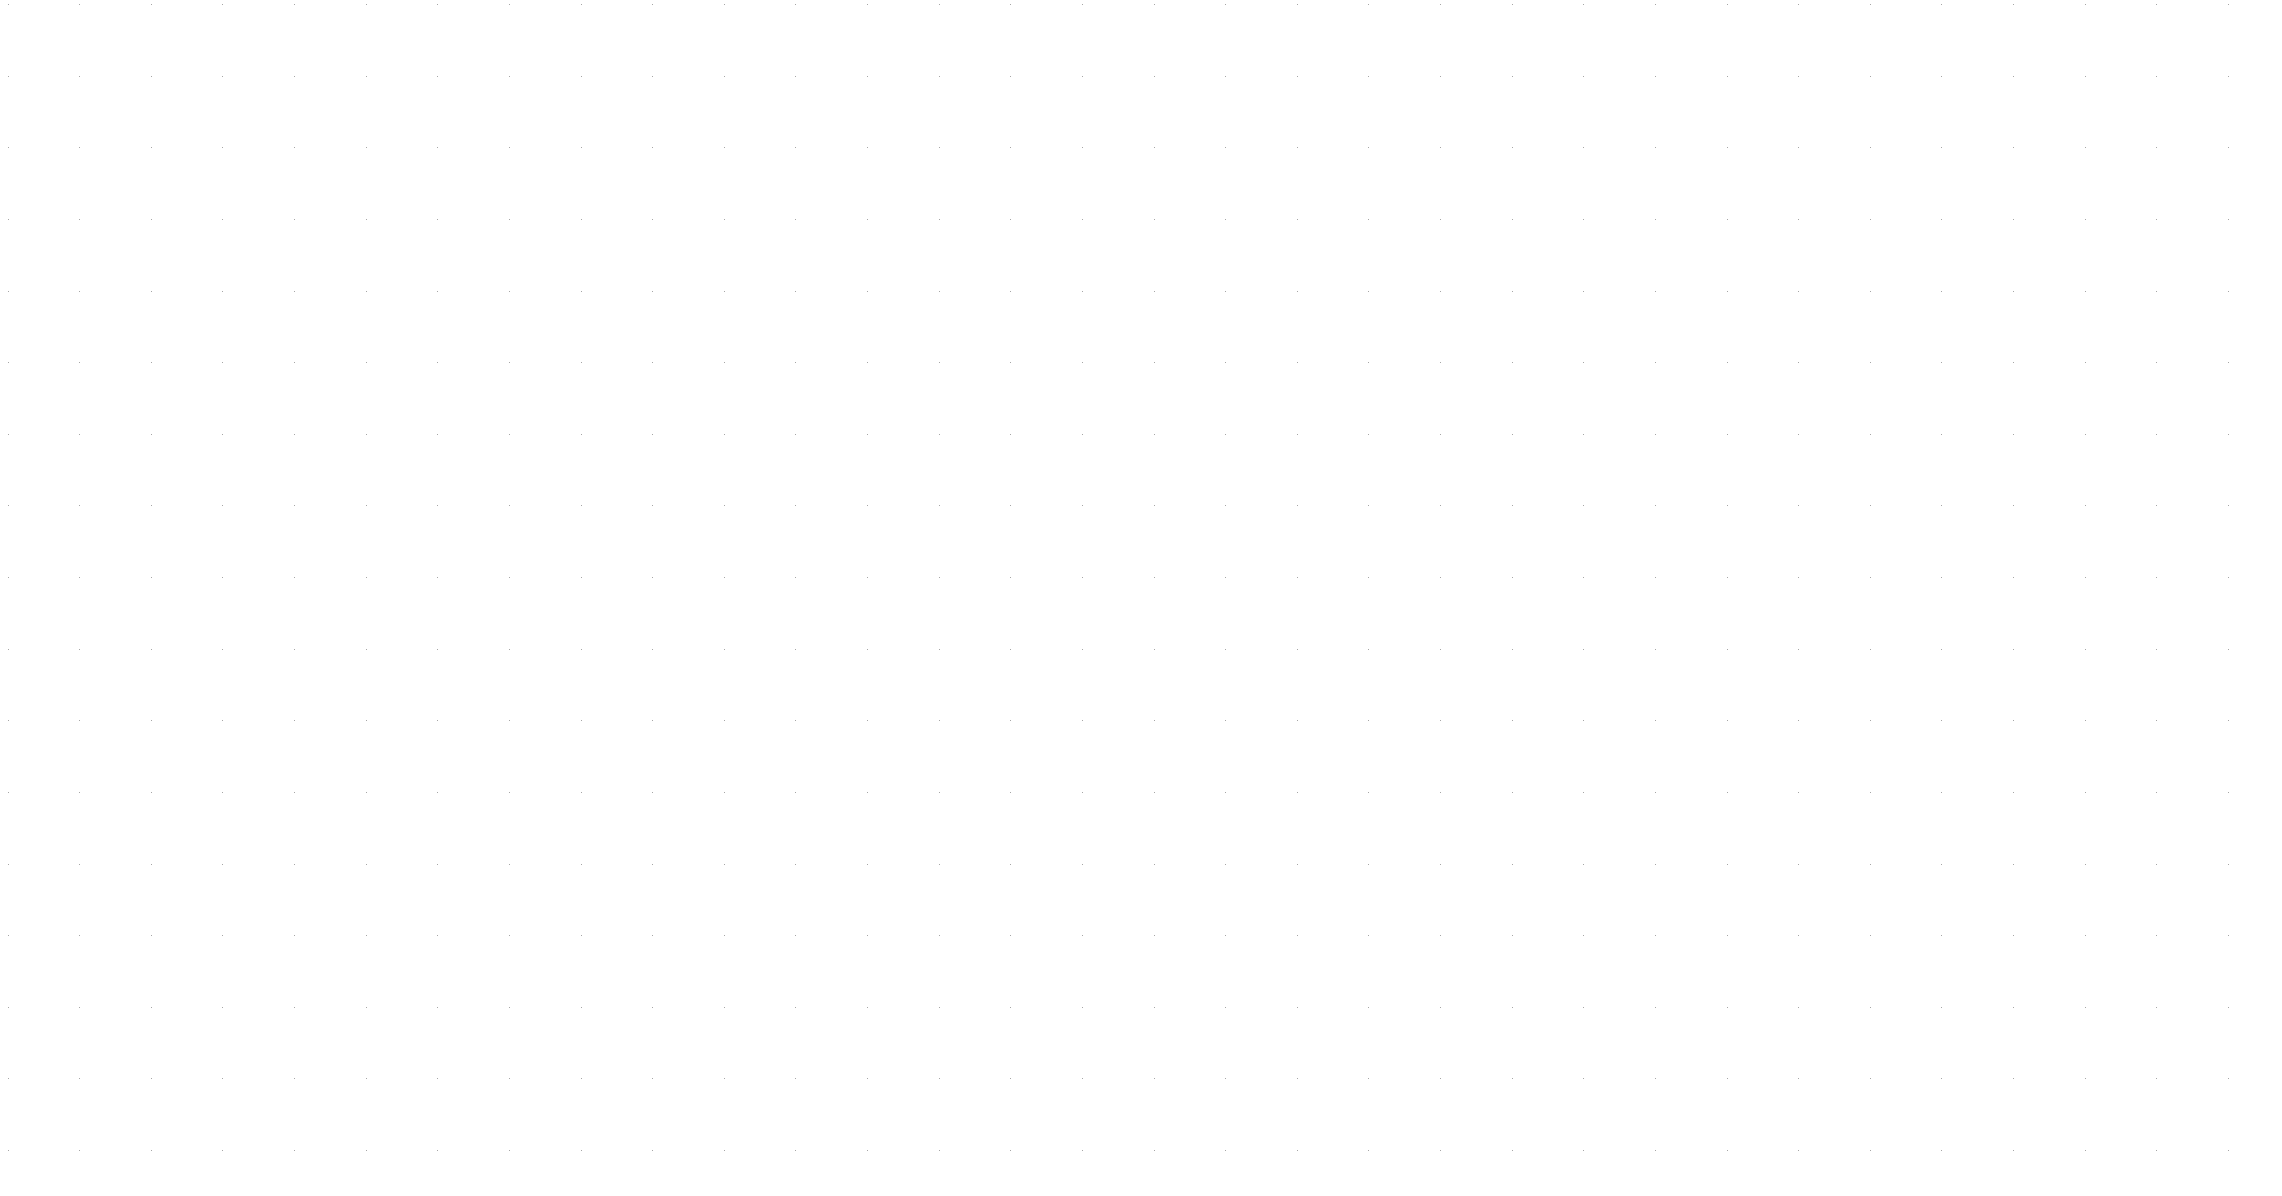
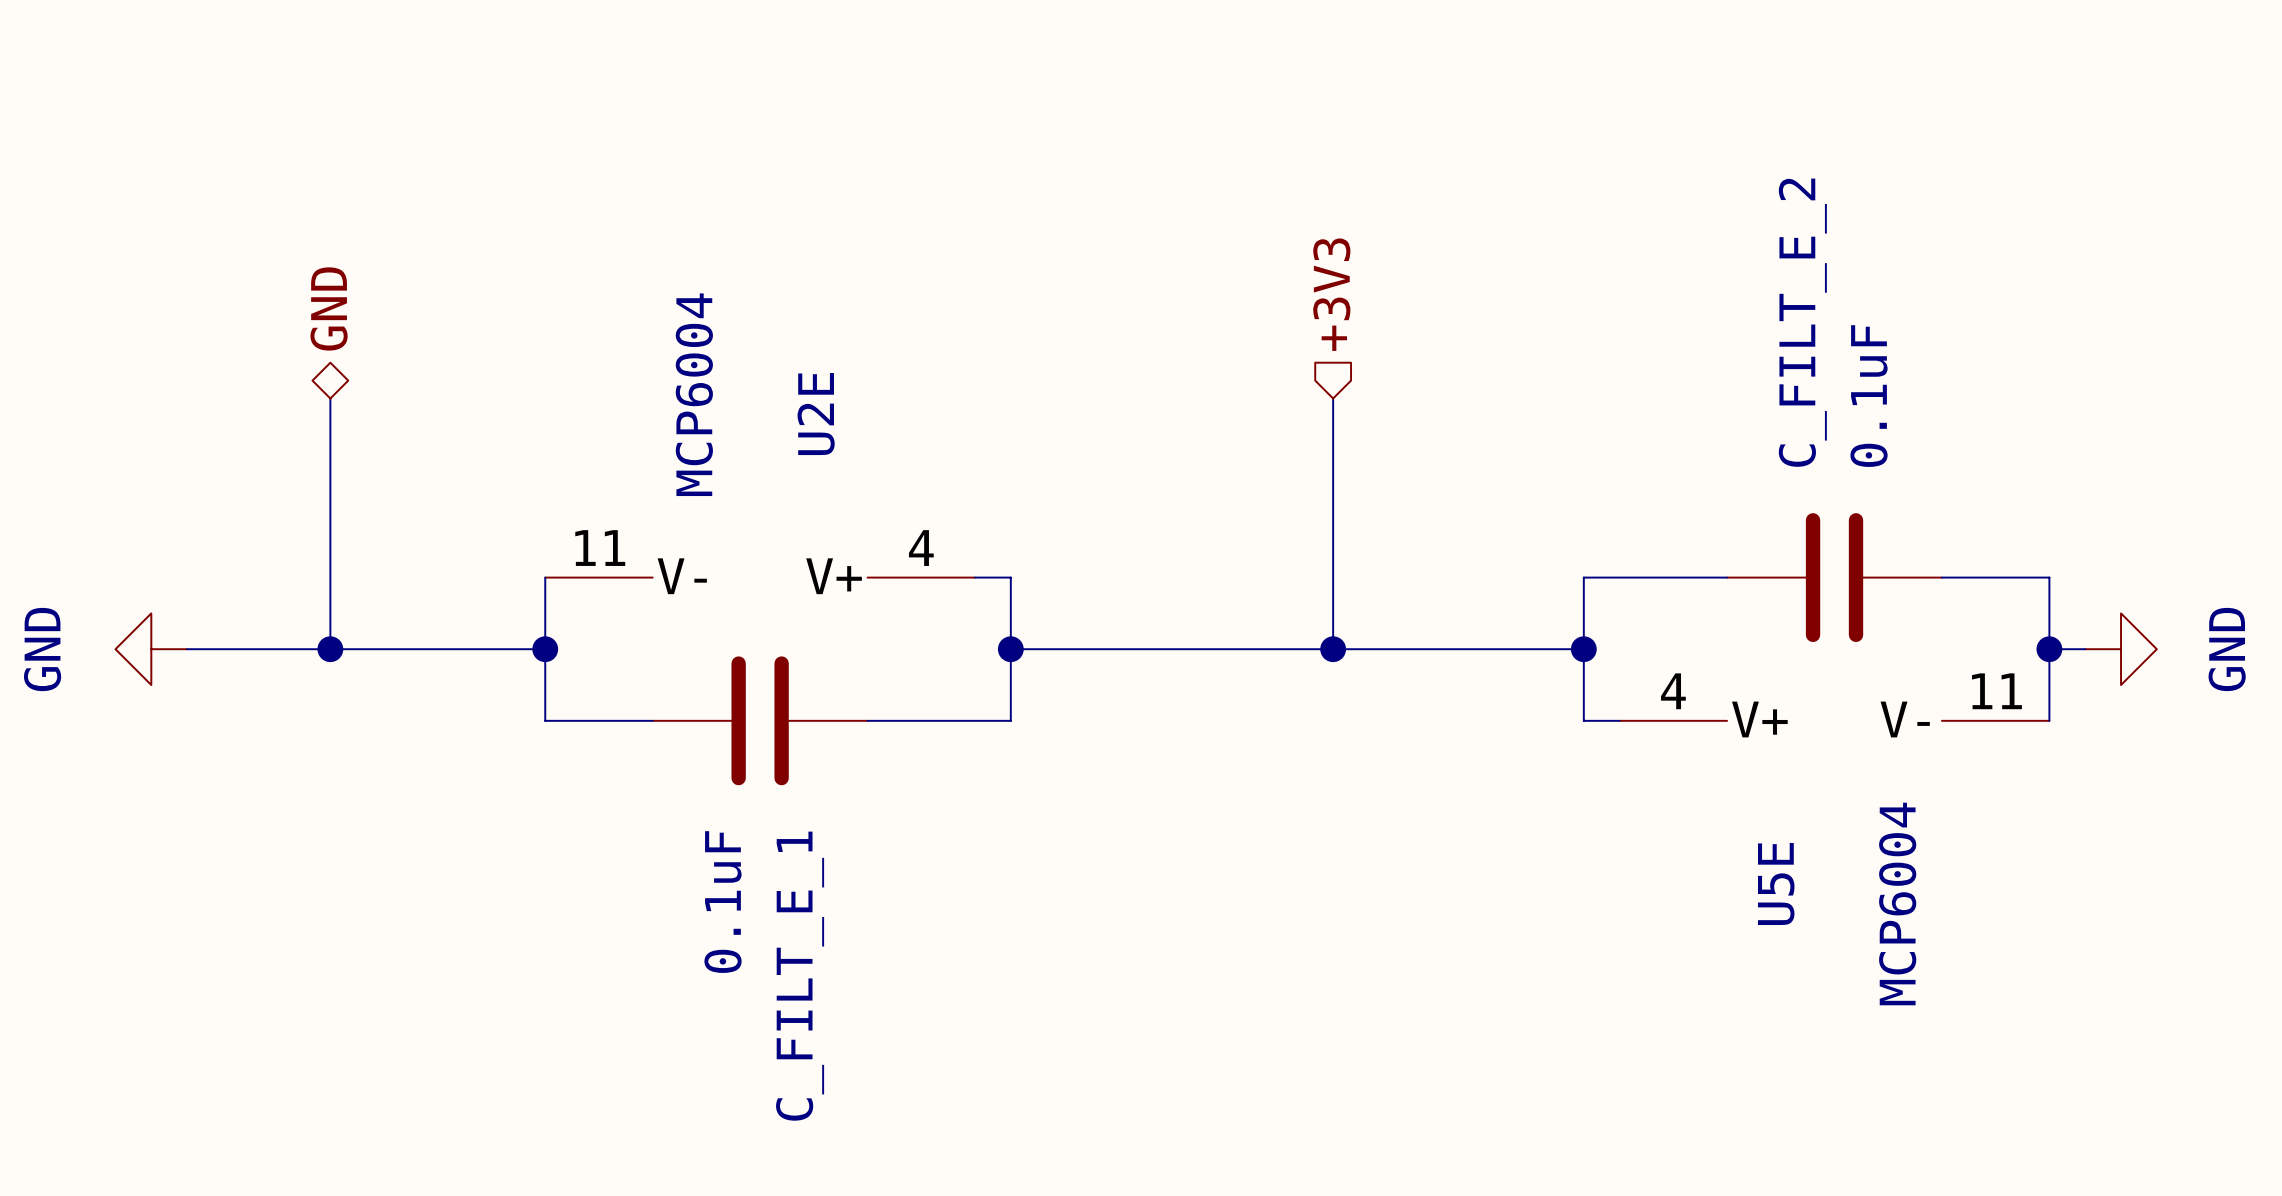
hierarchical label: none -> +3V3 (1331, 294)
hierarchical label: none -> GND (329, 308)
wire: none -> (330, 398) (330, 649)
wire: none -> (1333, 398) (1333, 649)
wire: none -> (545, 577) (545, 720) (652, 720)
U2E: none -> MCP6004 (760, 577)
wire: none -> (975, 577) (1010, 577) (1010, 720) (867, 720)
wire: none -> (1727, 577) (1583, 577) (1583, 720) (1619, 720)
C_FILT_E_2: none -> 0.1uF (1834, 577)
wire: none -> (1941, 577) (2049, 577) (2049, 720)
power symbol: none -> GND (151, 649)
wire: none -> (187, 649) (545, 649)
junction: none -> (330, 649)
junction: none -> (545, 649)
wire: none -> (1010, 649) (1583, 649)
junction: none -> (1010, 649)
junction: none -> (1333, 649)
junction: none -> (1583, 649)
wire: none -> (2049, 649) (2085, 649)
junction: none -> (2049, 649)
power symbol: none -> GND (2121, 649)
C_FILT_E_1: none -> 0.1uF (760, 720)
U5E: none -> MCP6004 (1834, 720)

